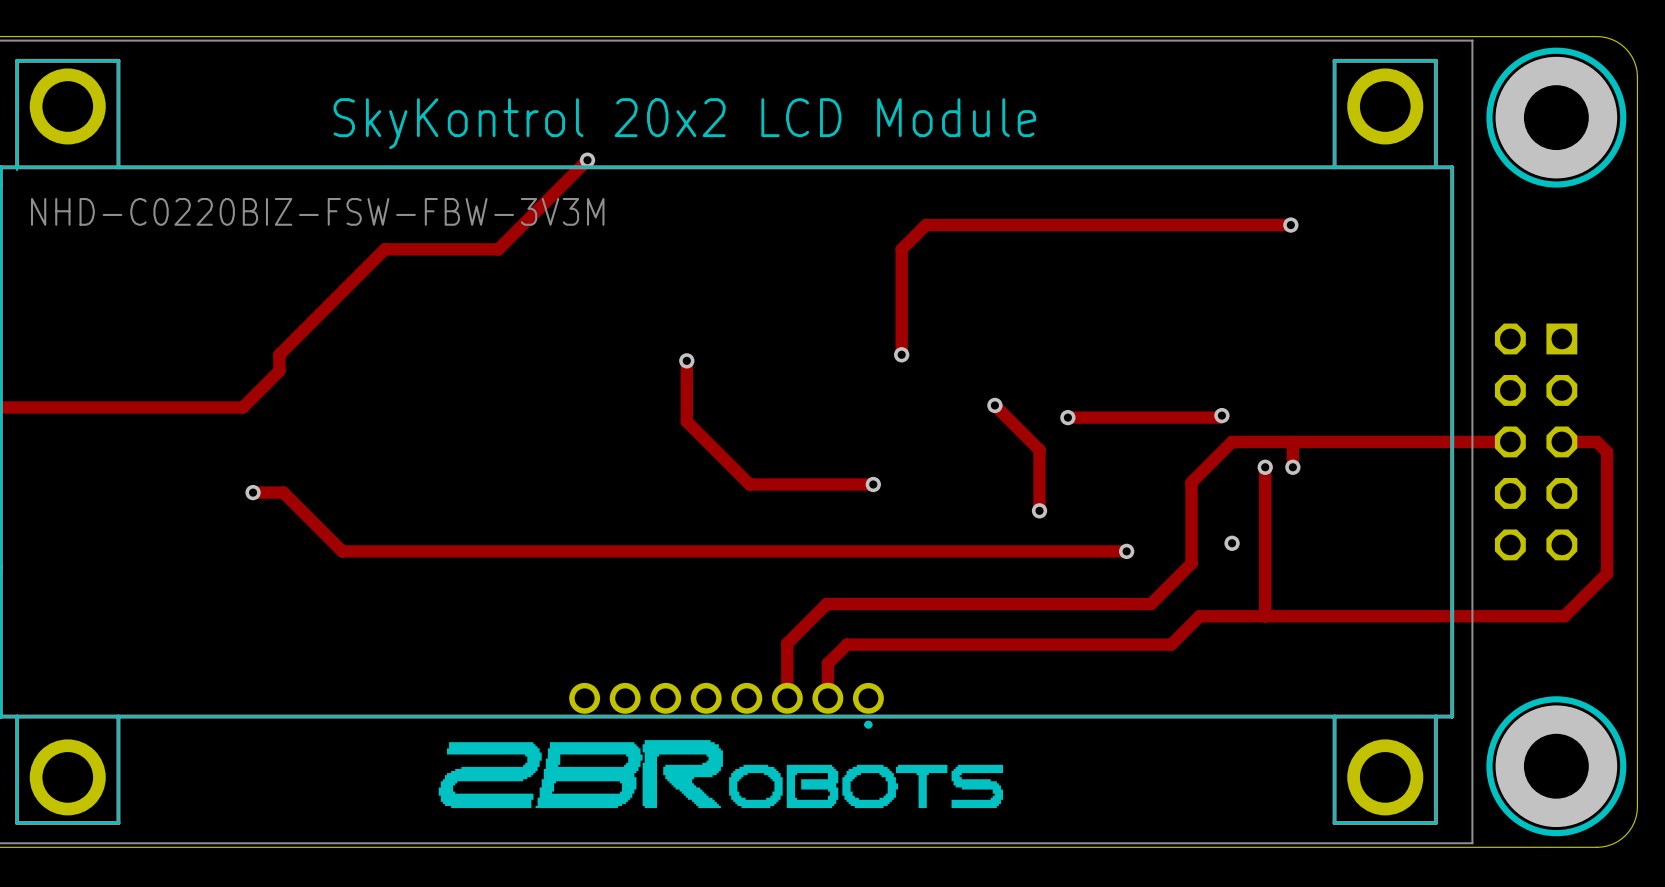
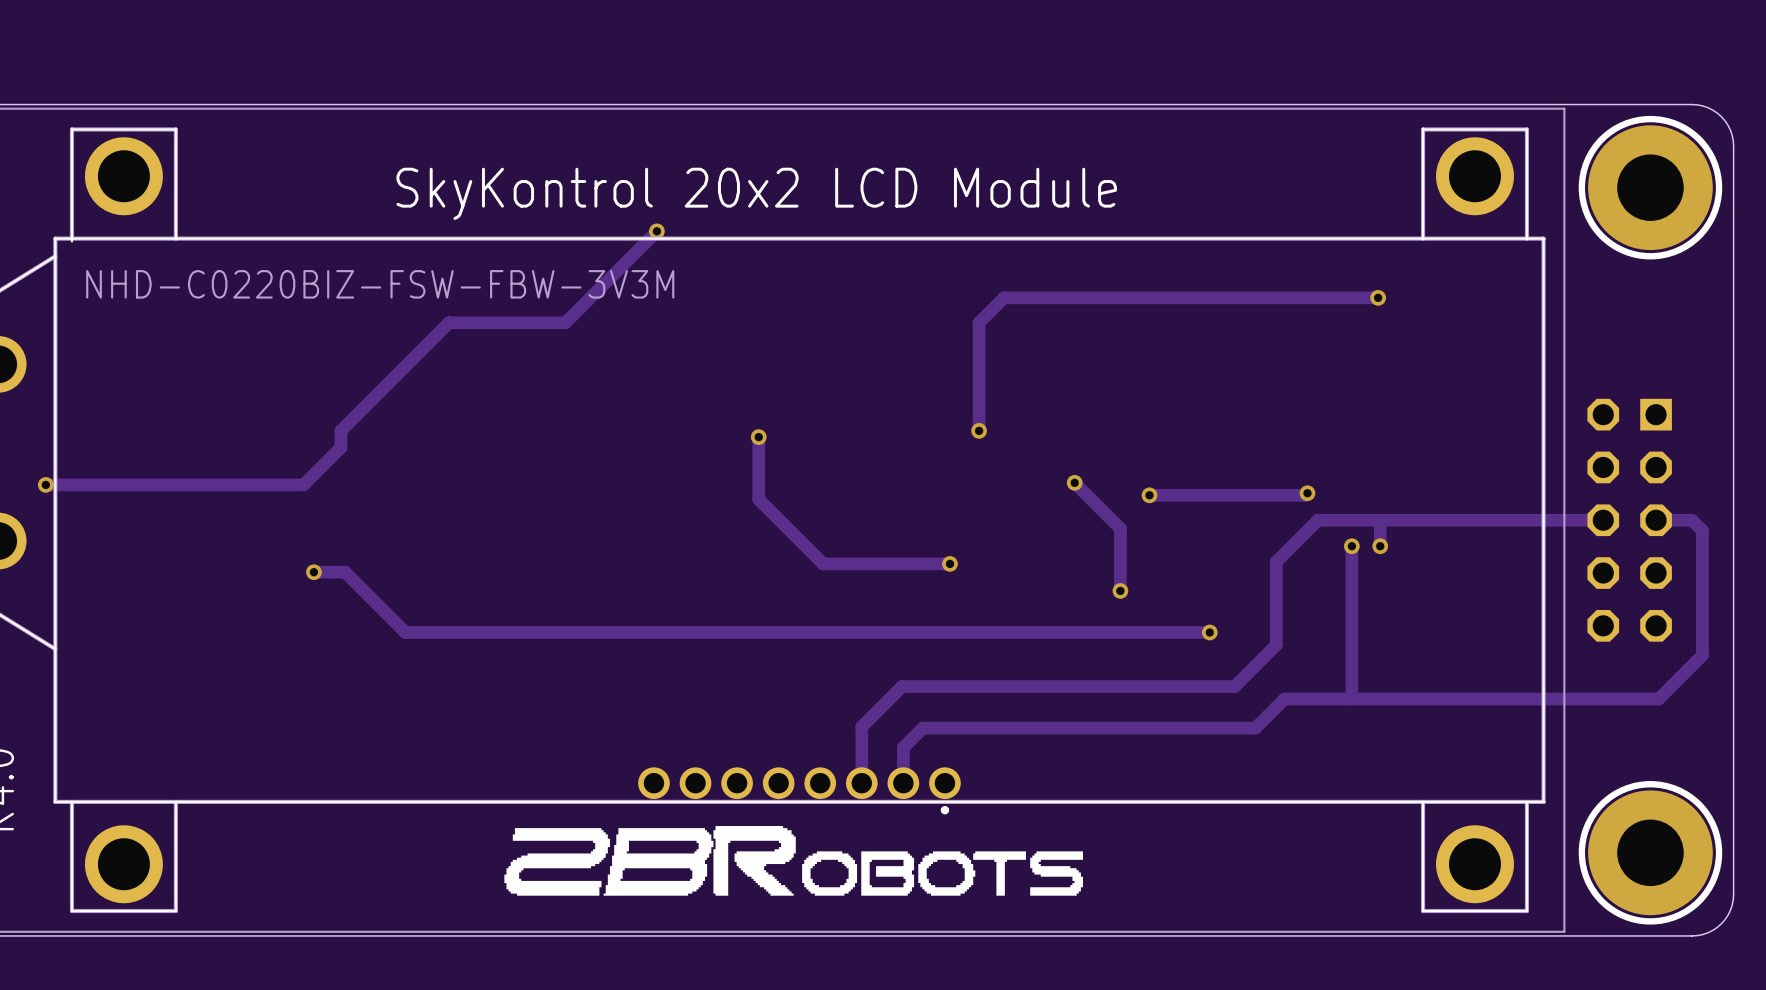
via: (1232, 543) -> none

